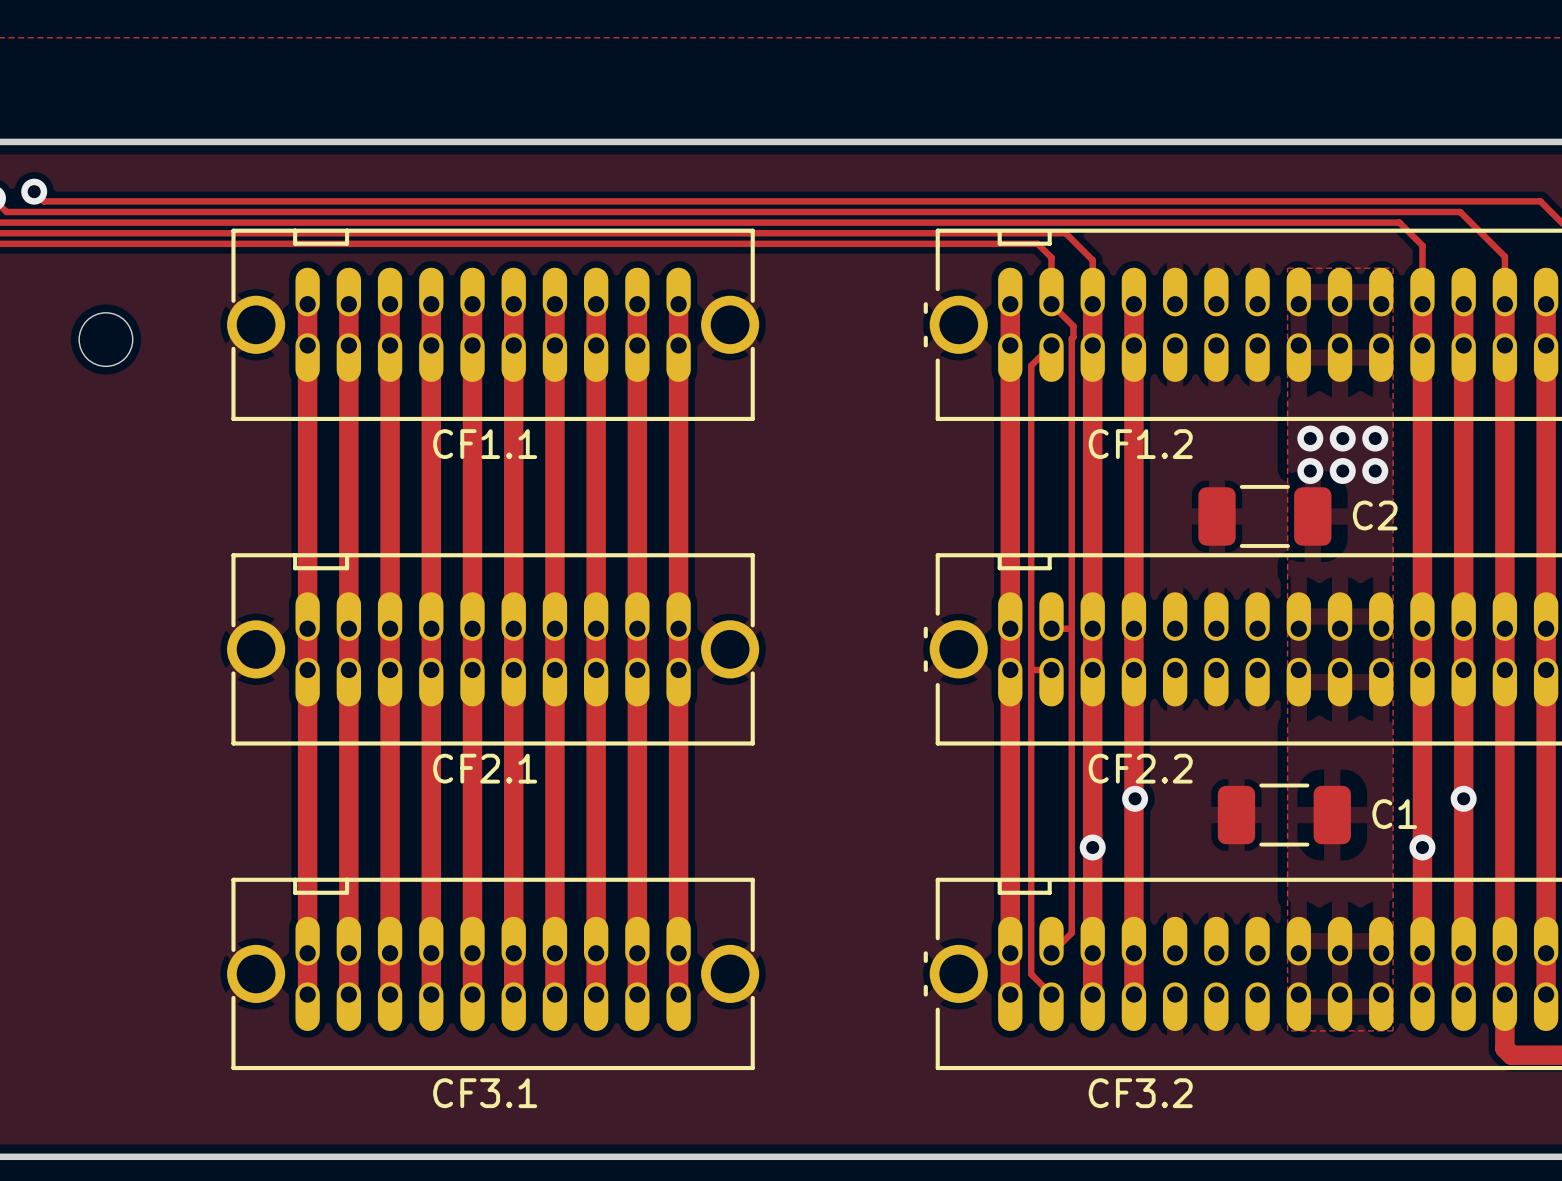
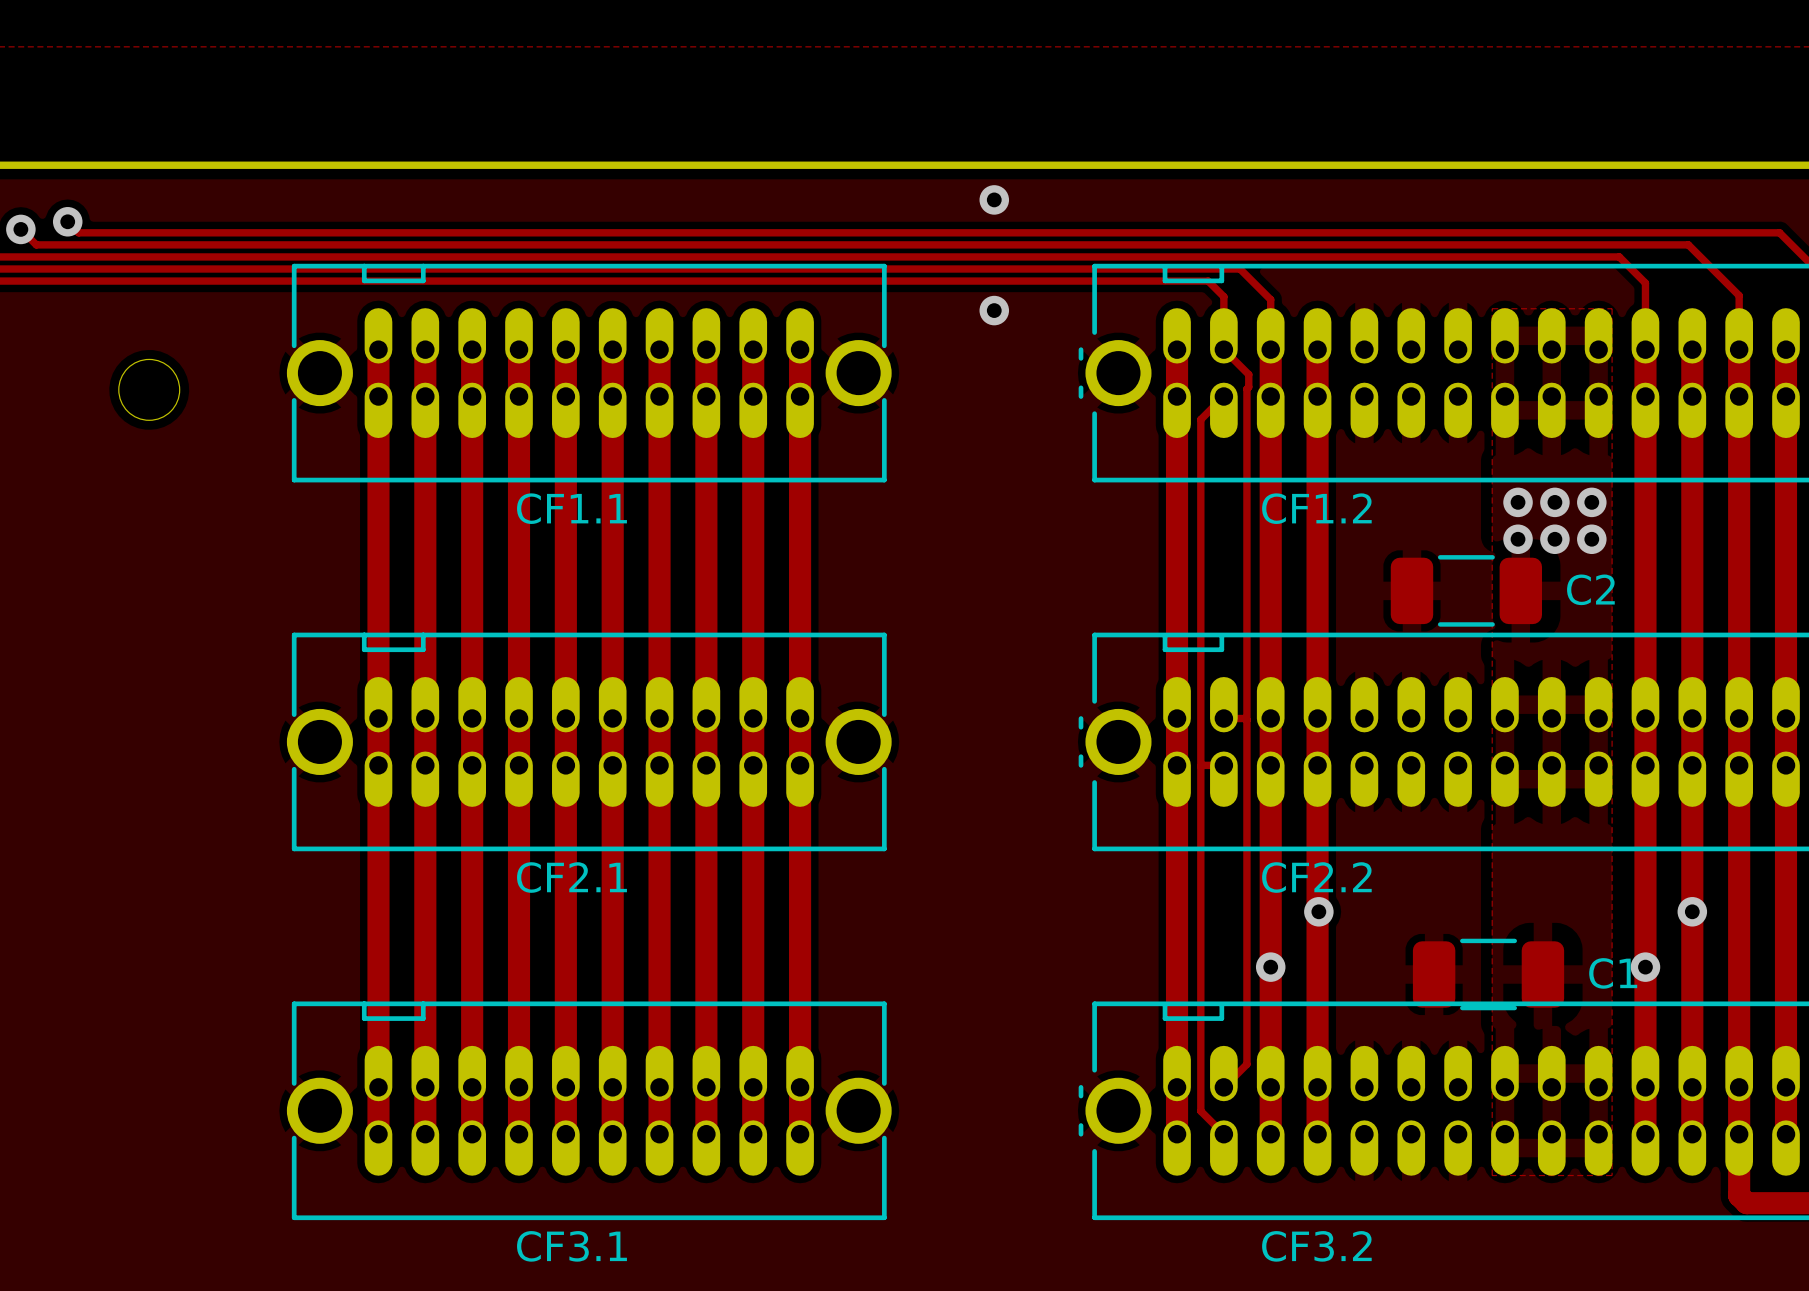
via: none -> (994, 199)
via: none -> (994, 310)
C1 position: (1284, 815) -> (1488, 974)

